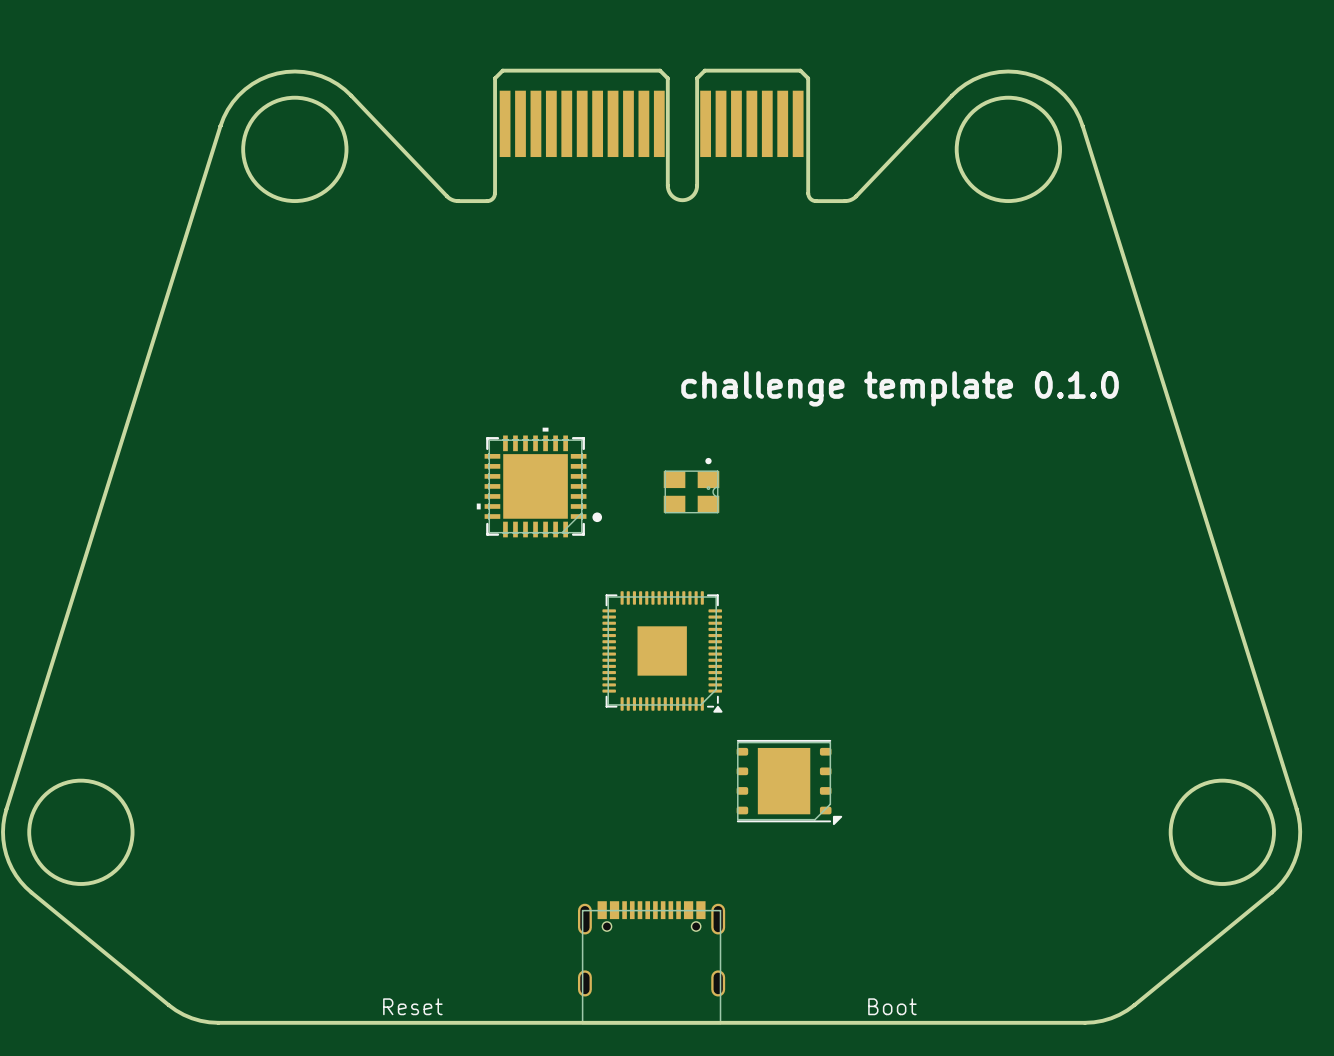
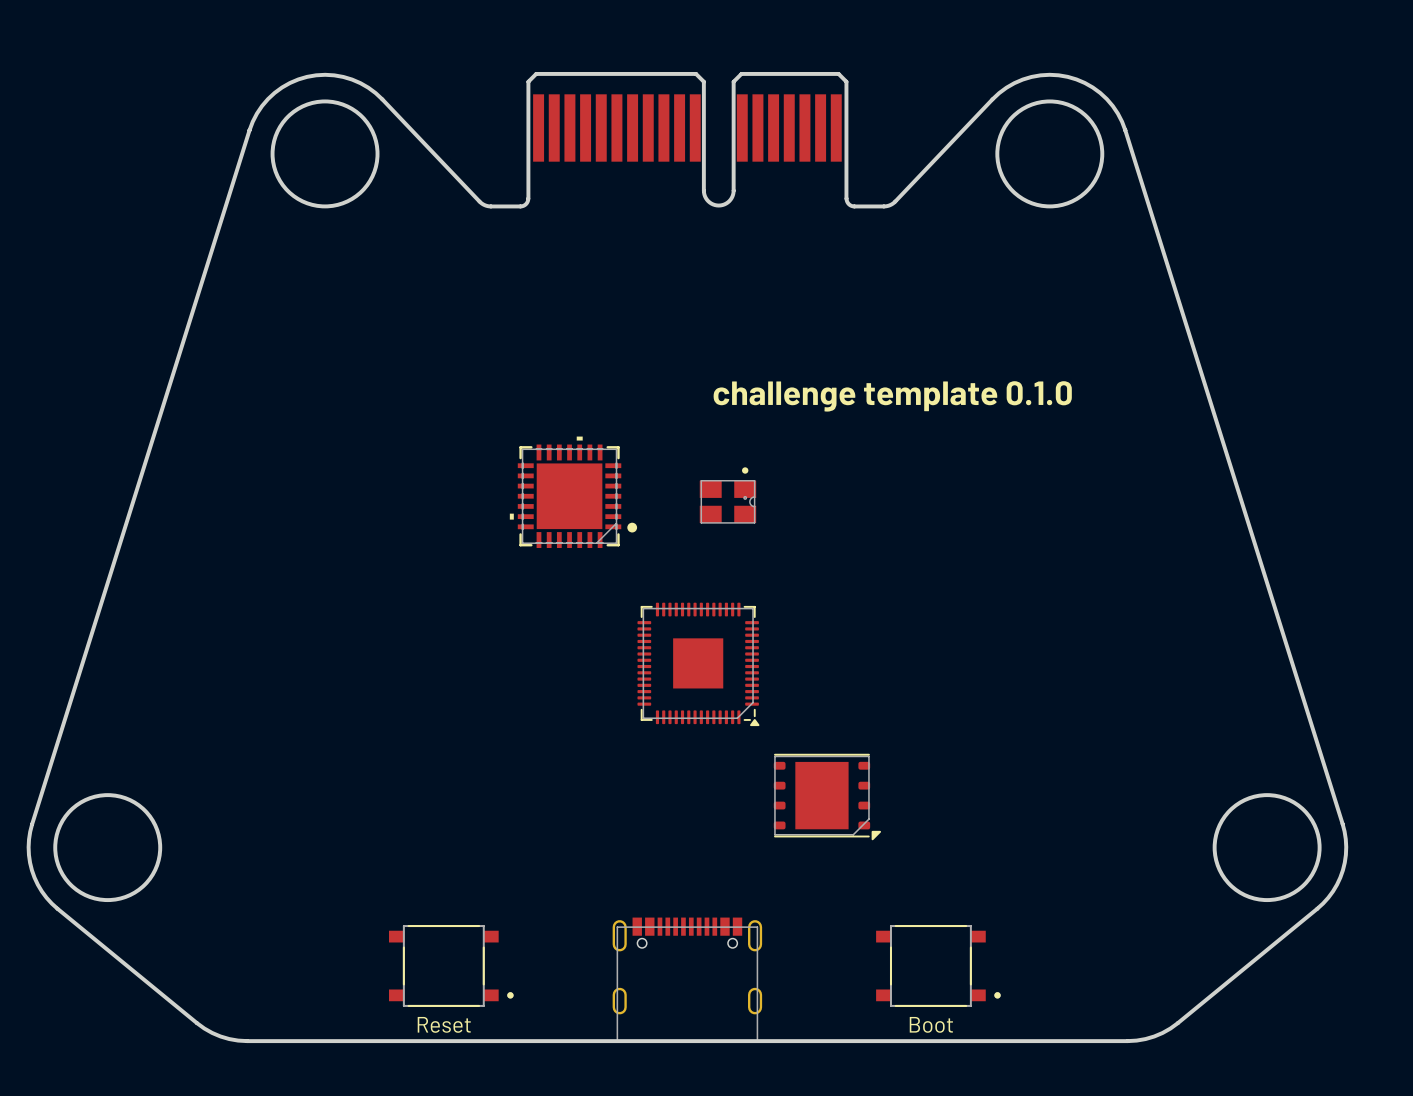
part: none -> (451, 965)
part: none -> (938, 965)

